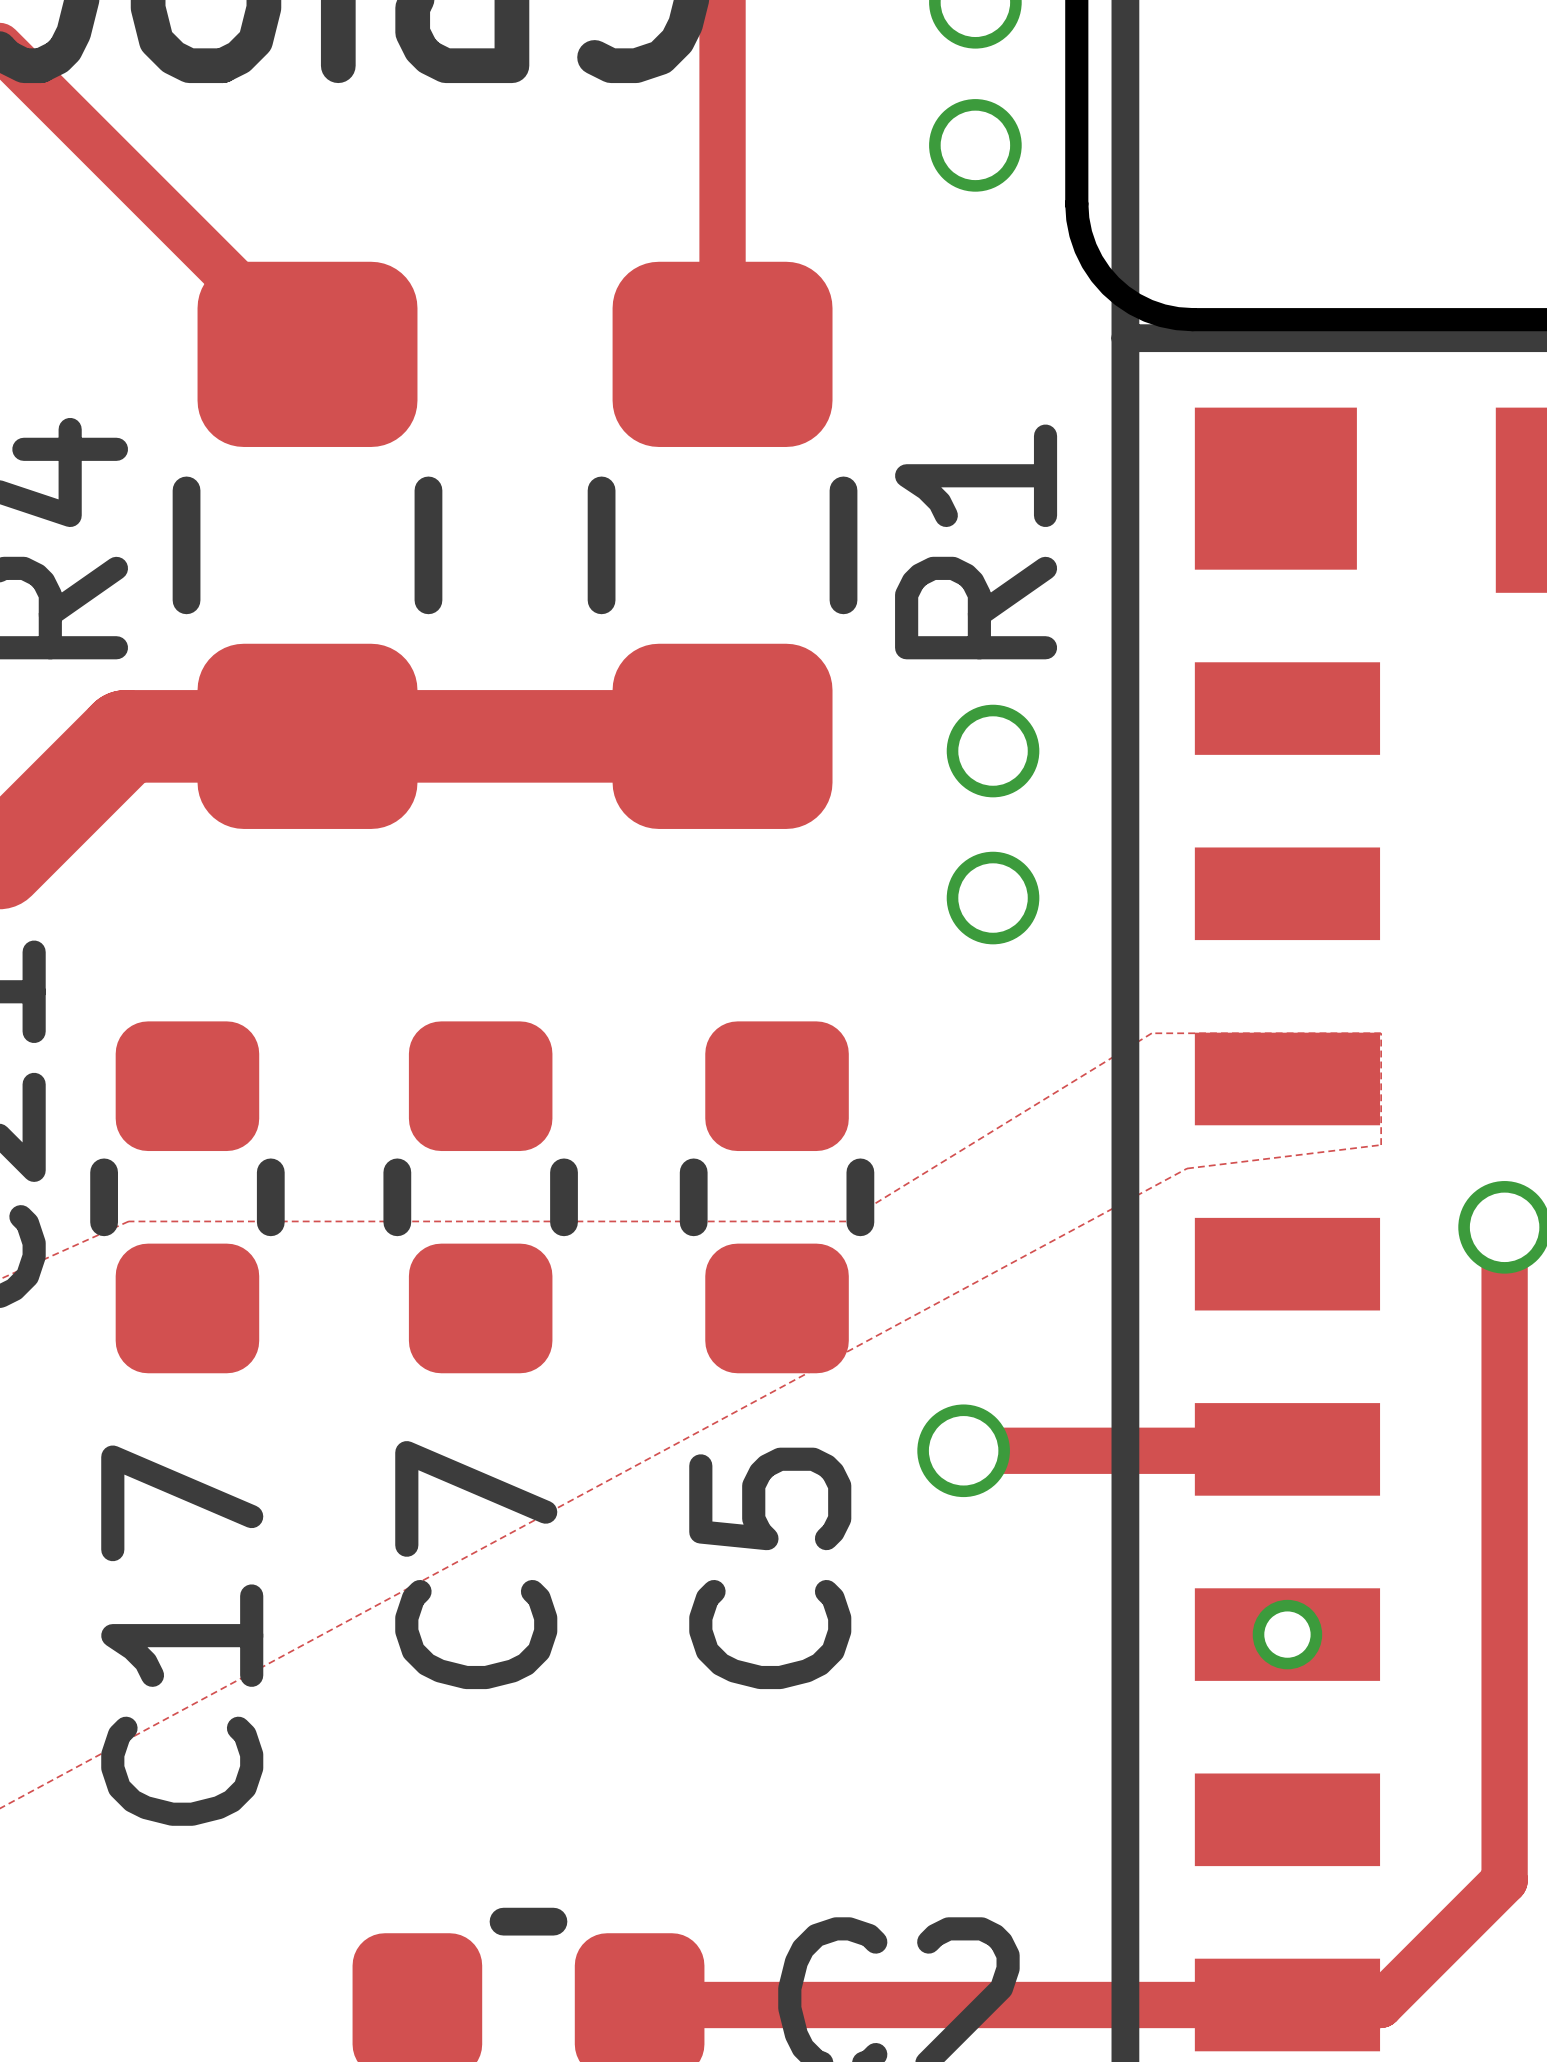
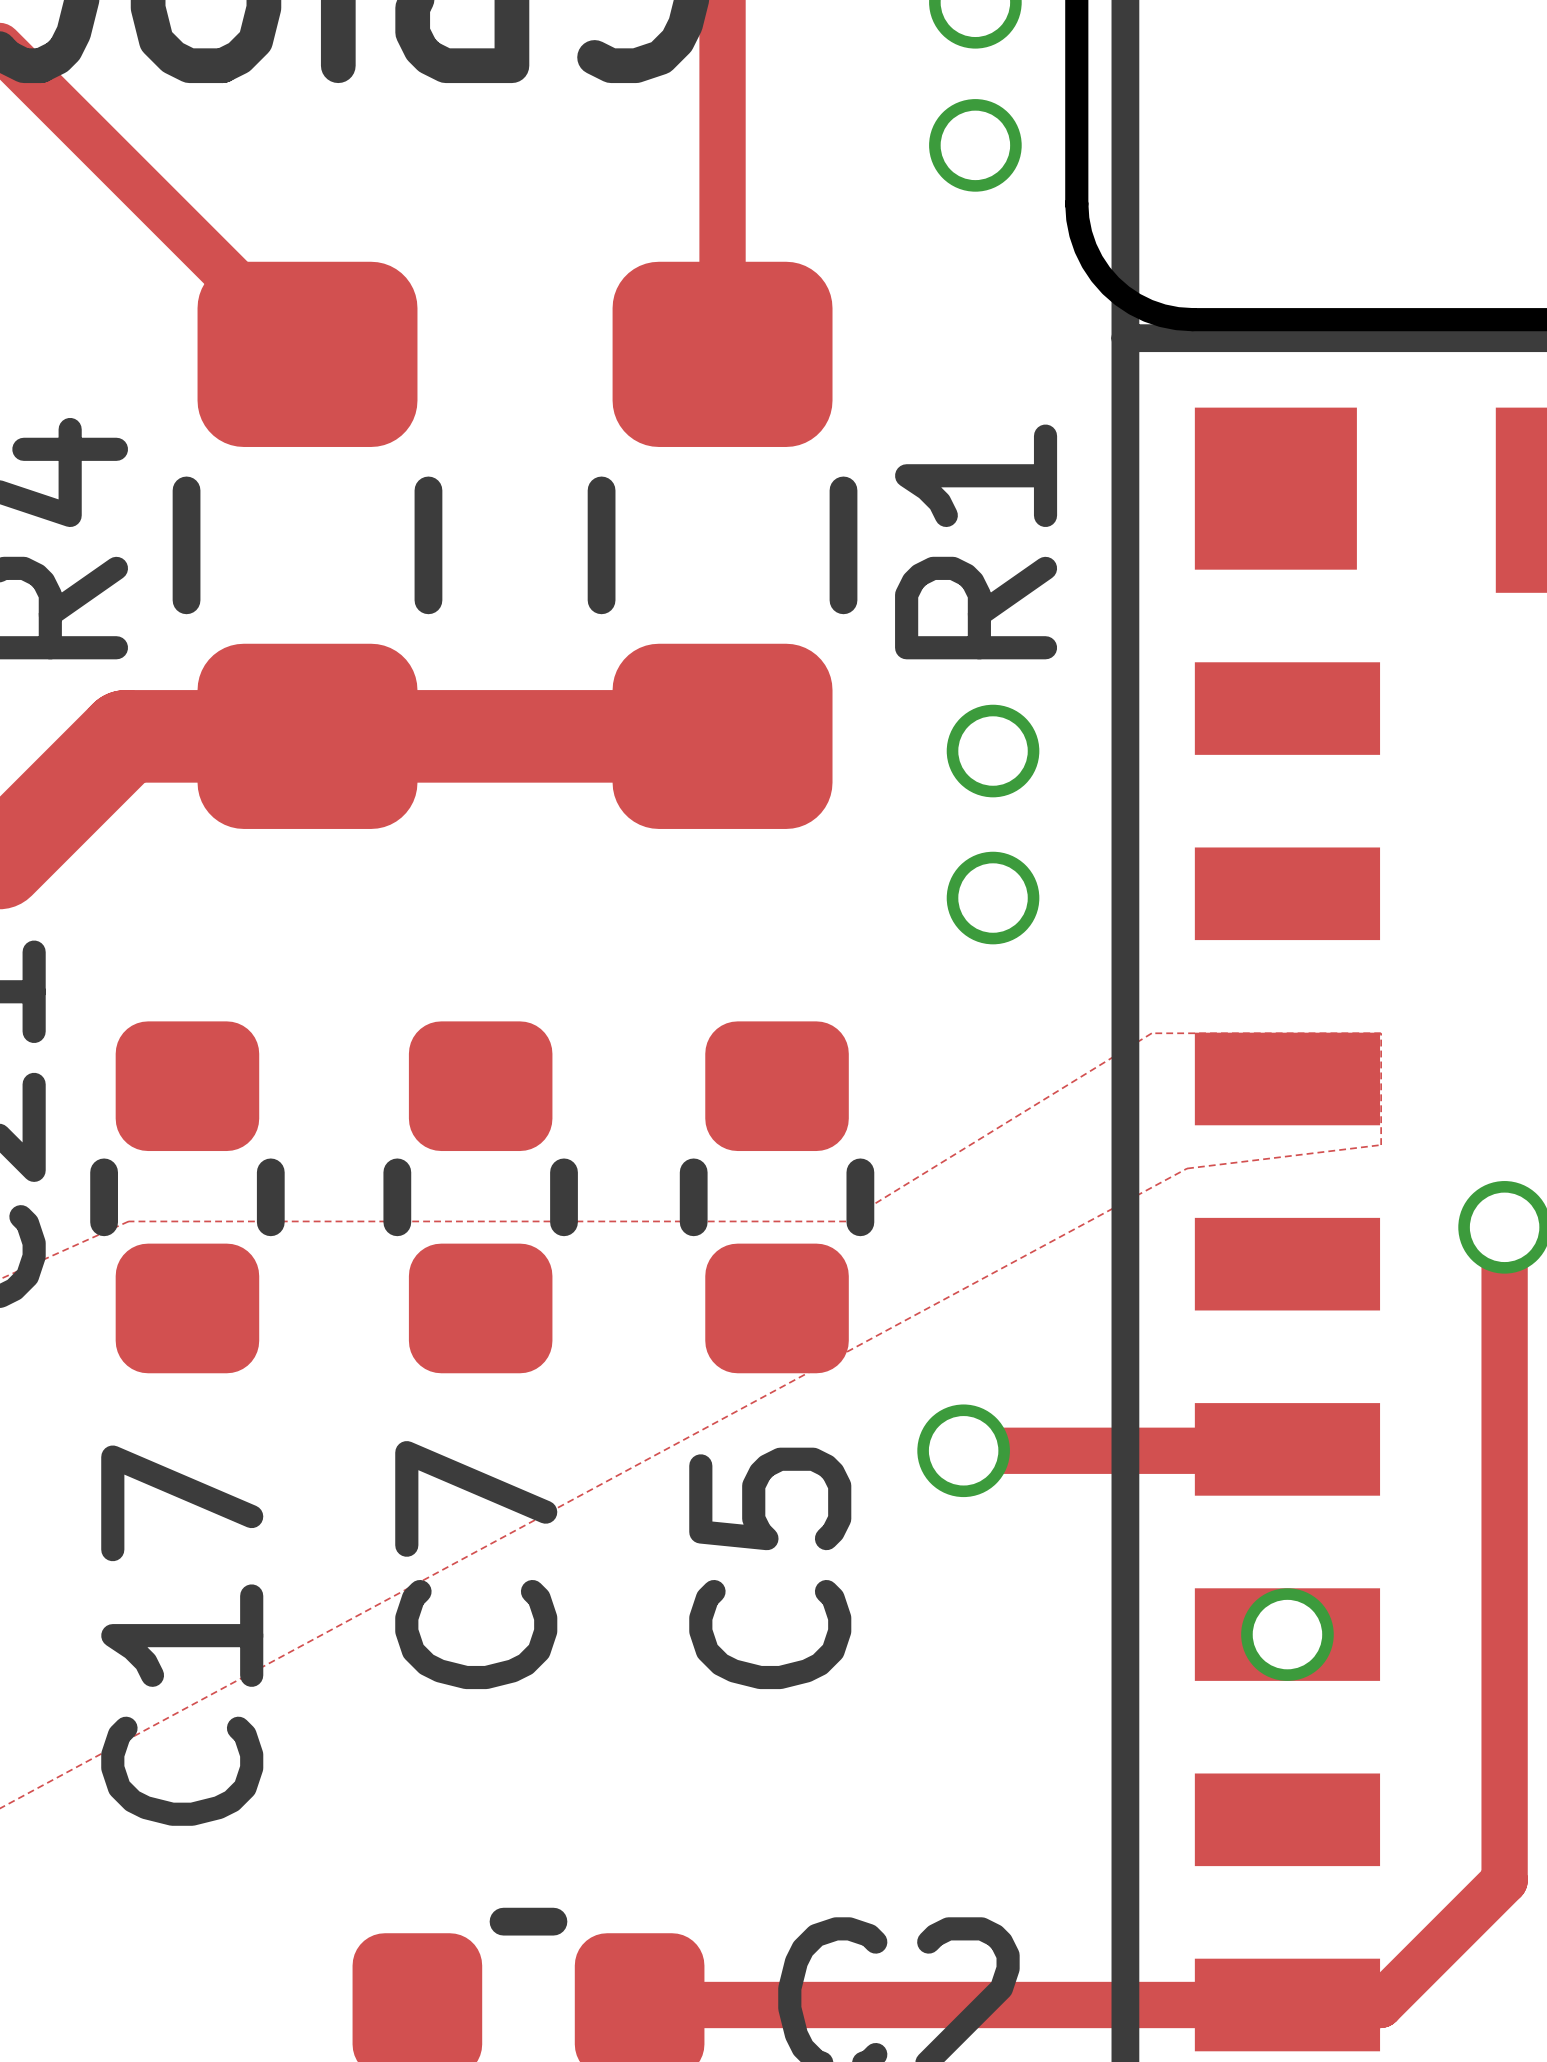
via size: [1252, 1599, 1323, 1670] -> [1241, 1588, 1334, 1681]

